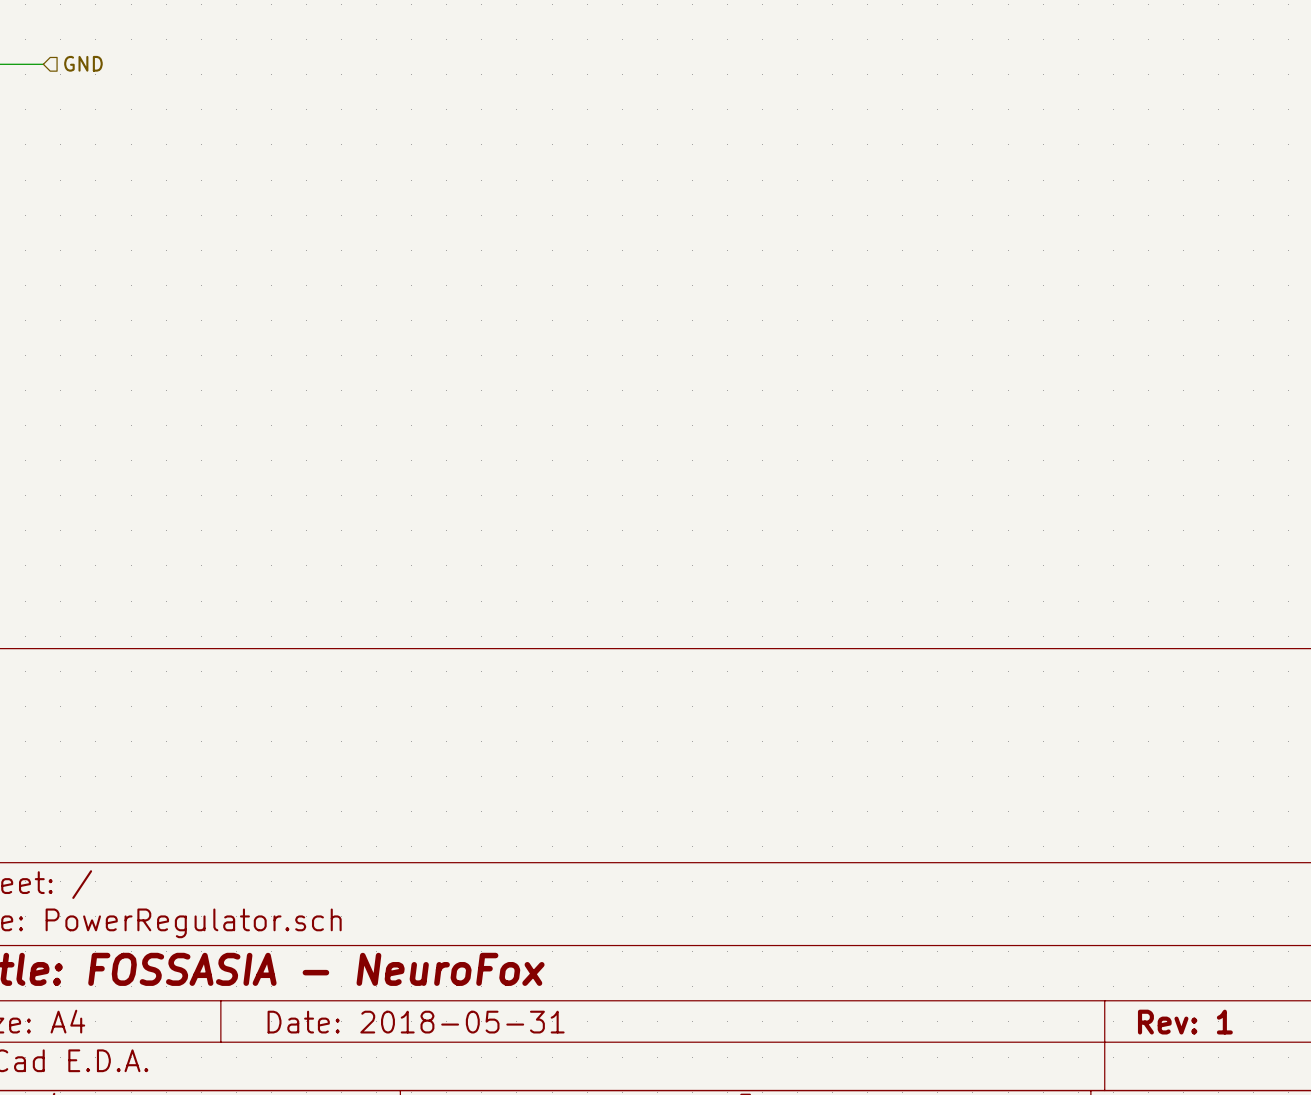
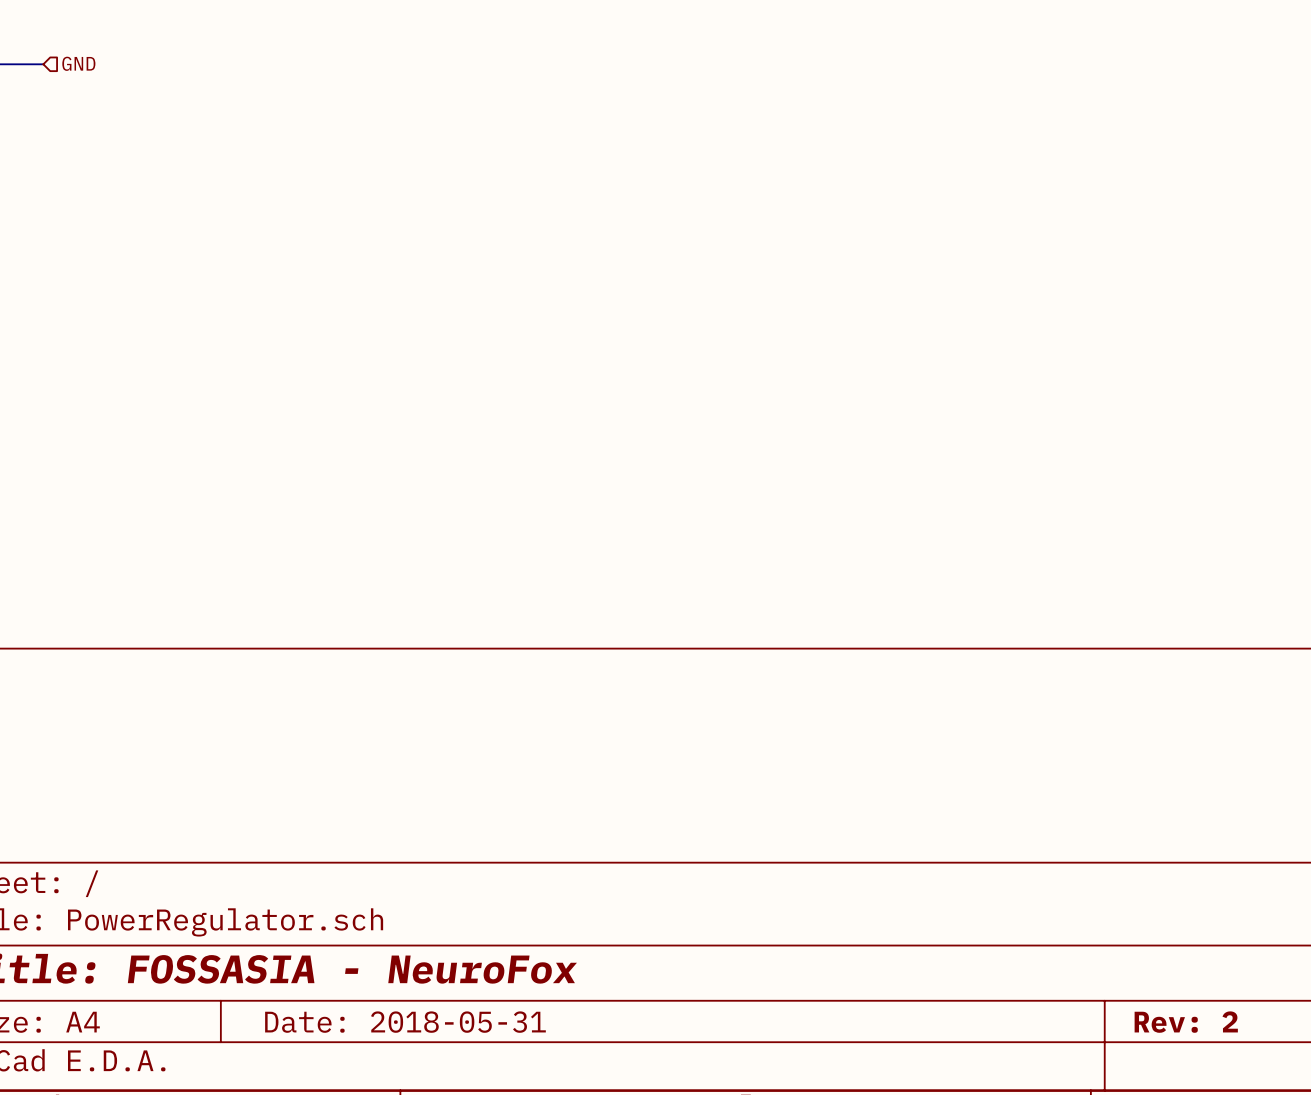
title block: Rev: 1 (1185, 1022) -> Rev: 2 (1186, 1022)

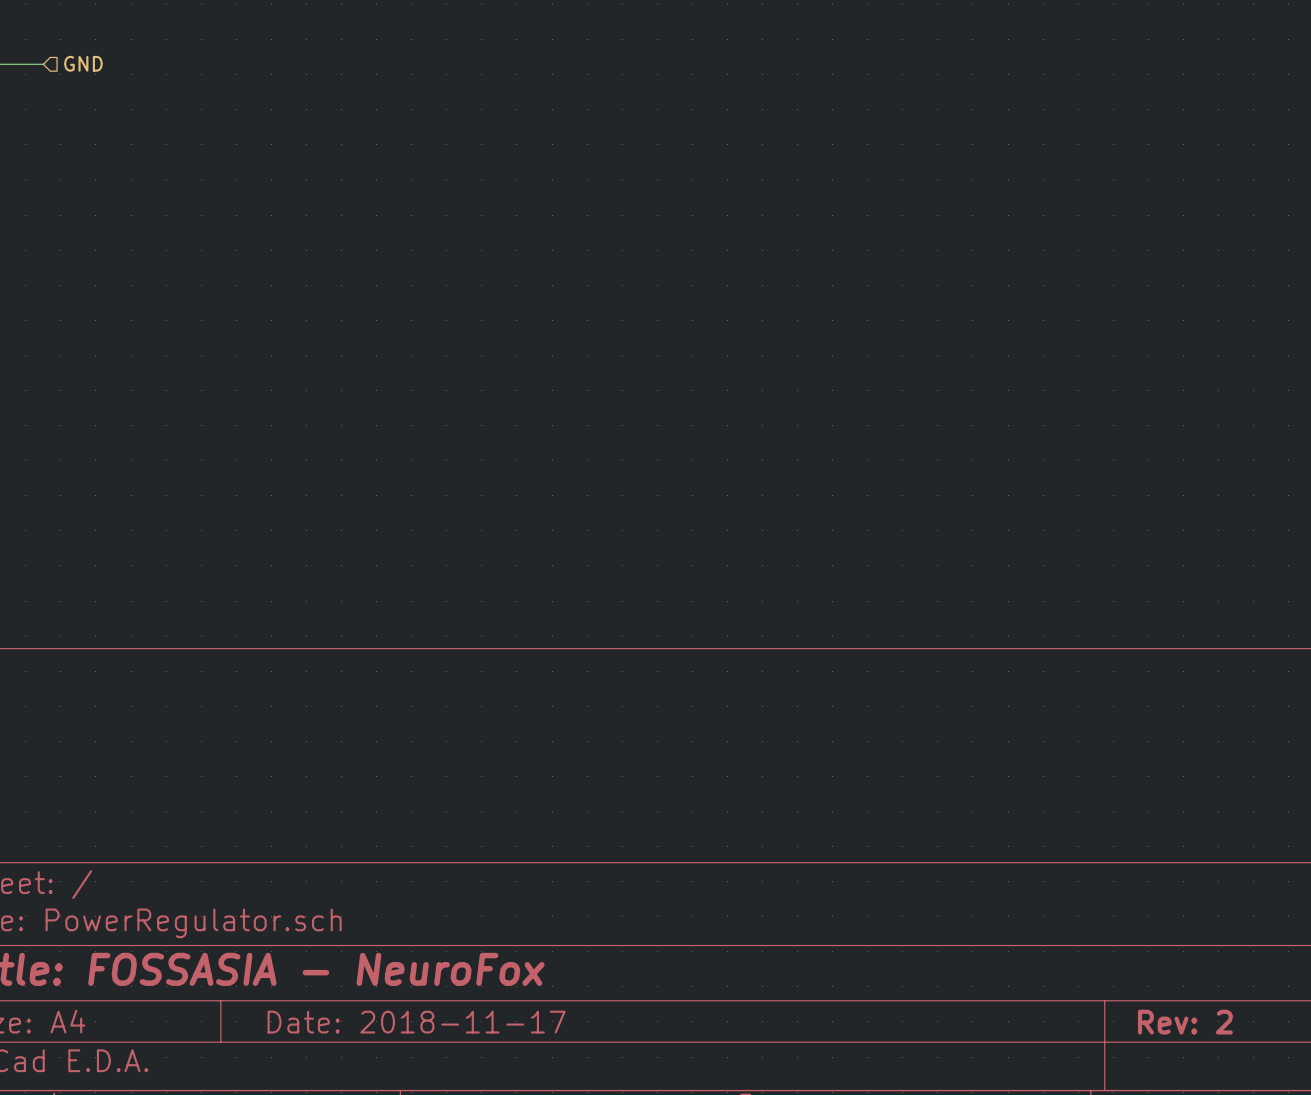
title block: Date: 2018-05-31 (405, 1022) -> Date: 2018-11-17 (416, 1022)

